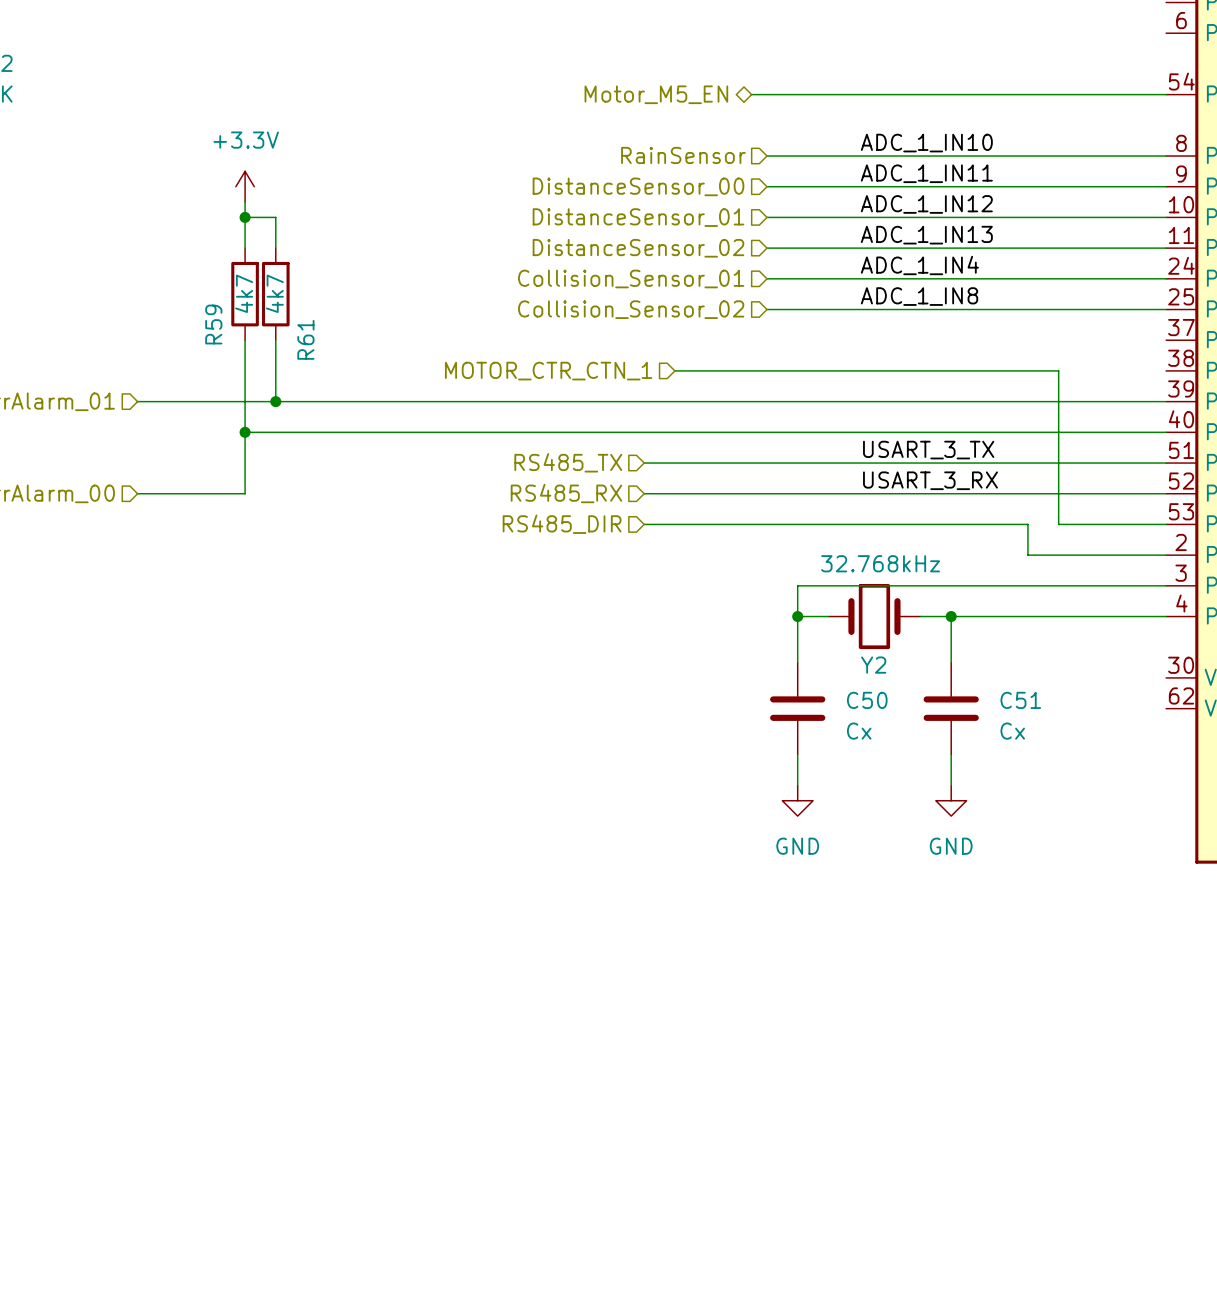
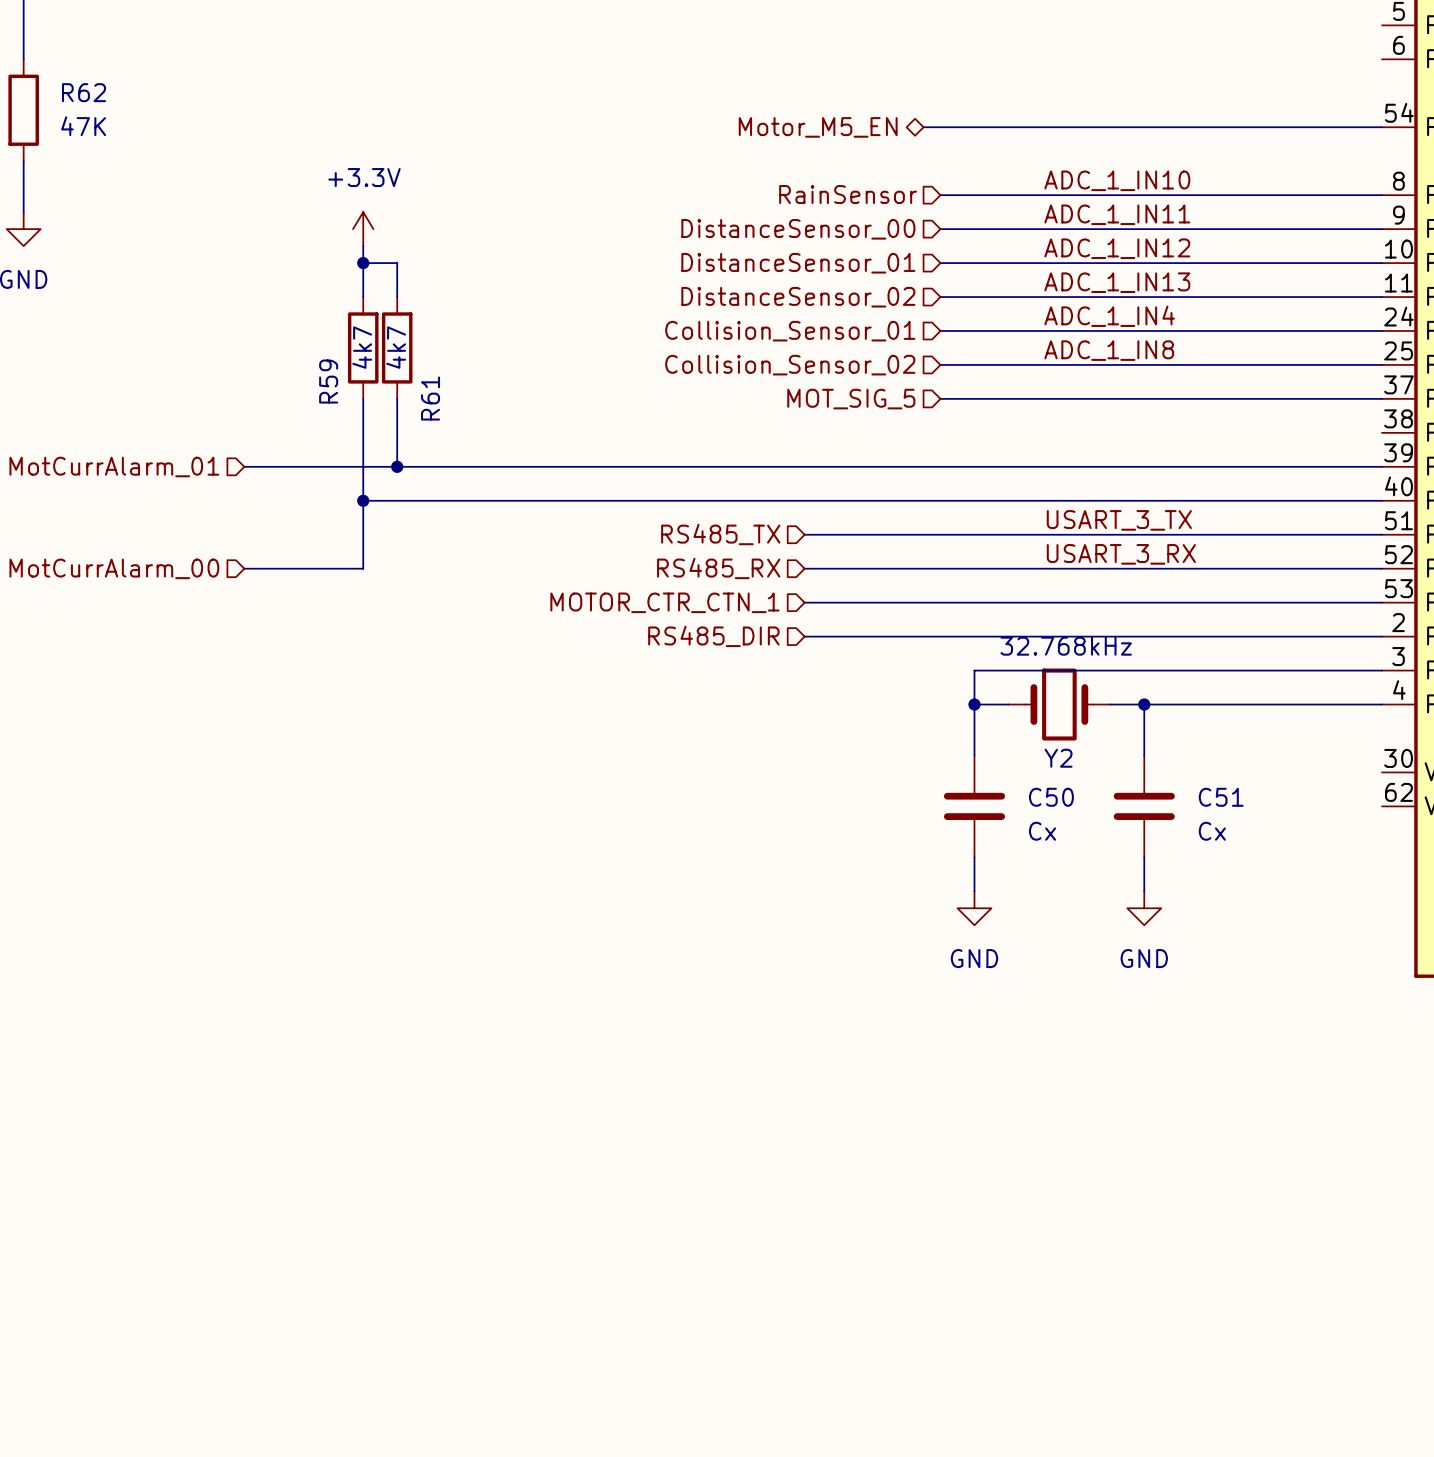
hierarchical label: none -> MOT_SIG_5 (851, 399)
wire: none -> (940, 398) (1381, 398)
wire: (674, 370) (1058, 370) (1058, 524) -> none
hierarchical label: MOTOR_CTR_CTN_1 (548, 371) -> none
hierarchical label: RS485_DIR (562, 524) -> MOTOR_CTR_CTN_1 (664, 602)
wire: (1027, 524) (1027, 555) -> (1229, 602) (1263, 602)
hierarchical label: none -> RS485_DIR (713, 636)
wire: none -> (804, 636) (1229, 636)

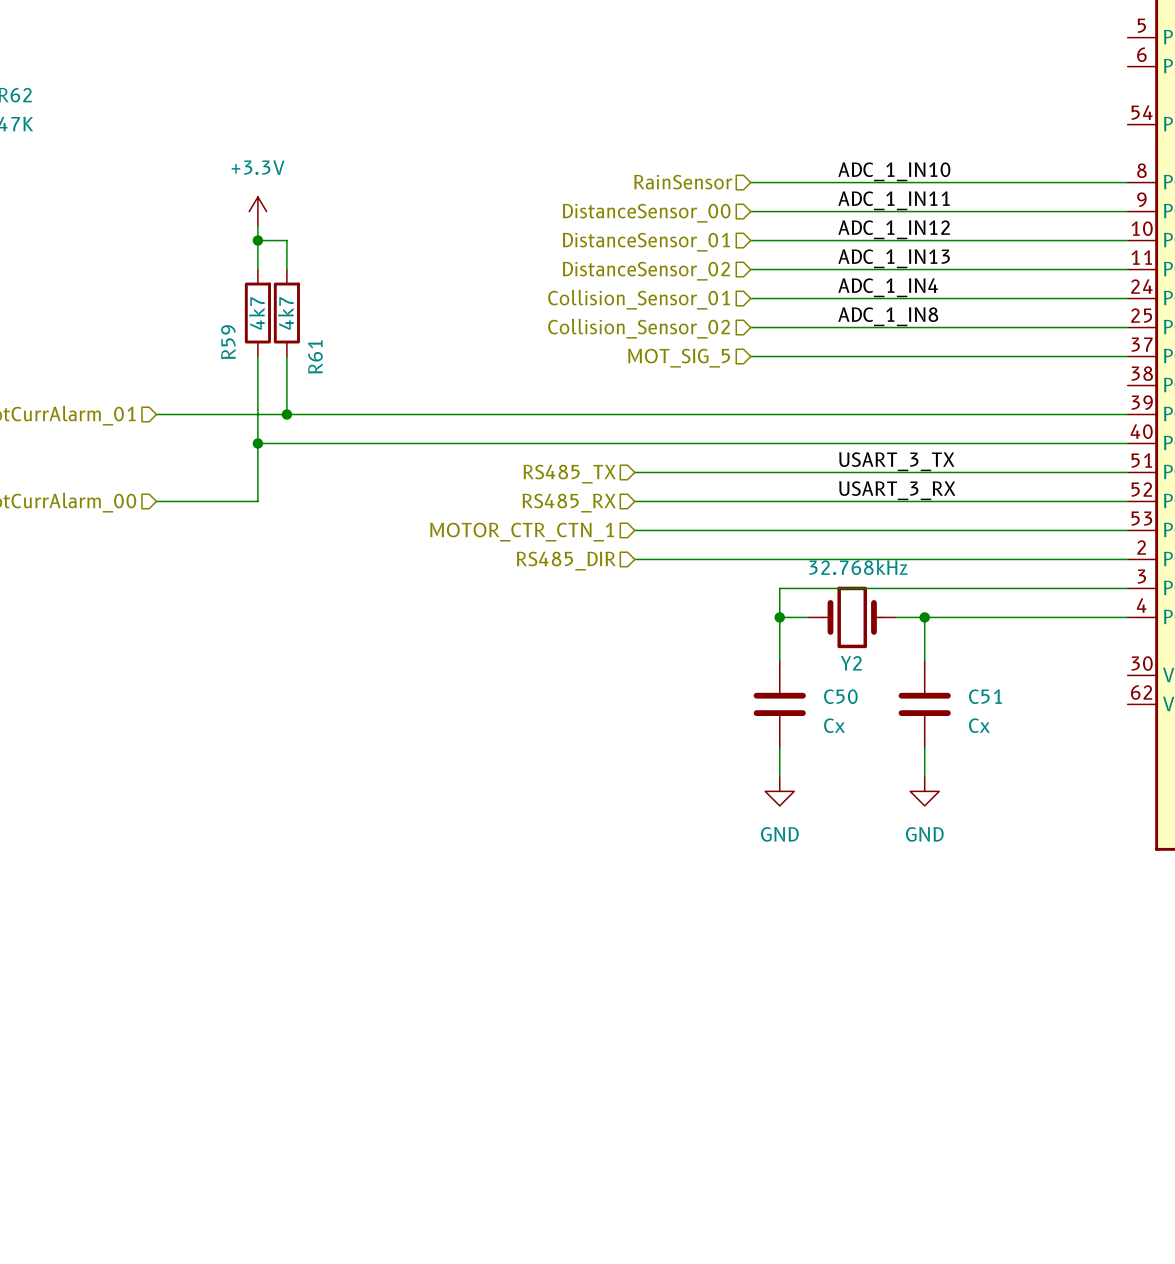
hierarchical label: Motor_M5_EN (818, 127) -> none
wire: (923, 127) (1381, 127) -> none

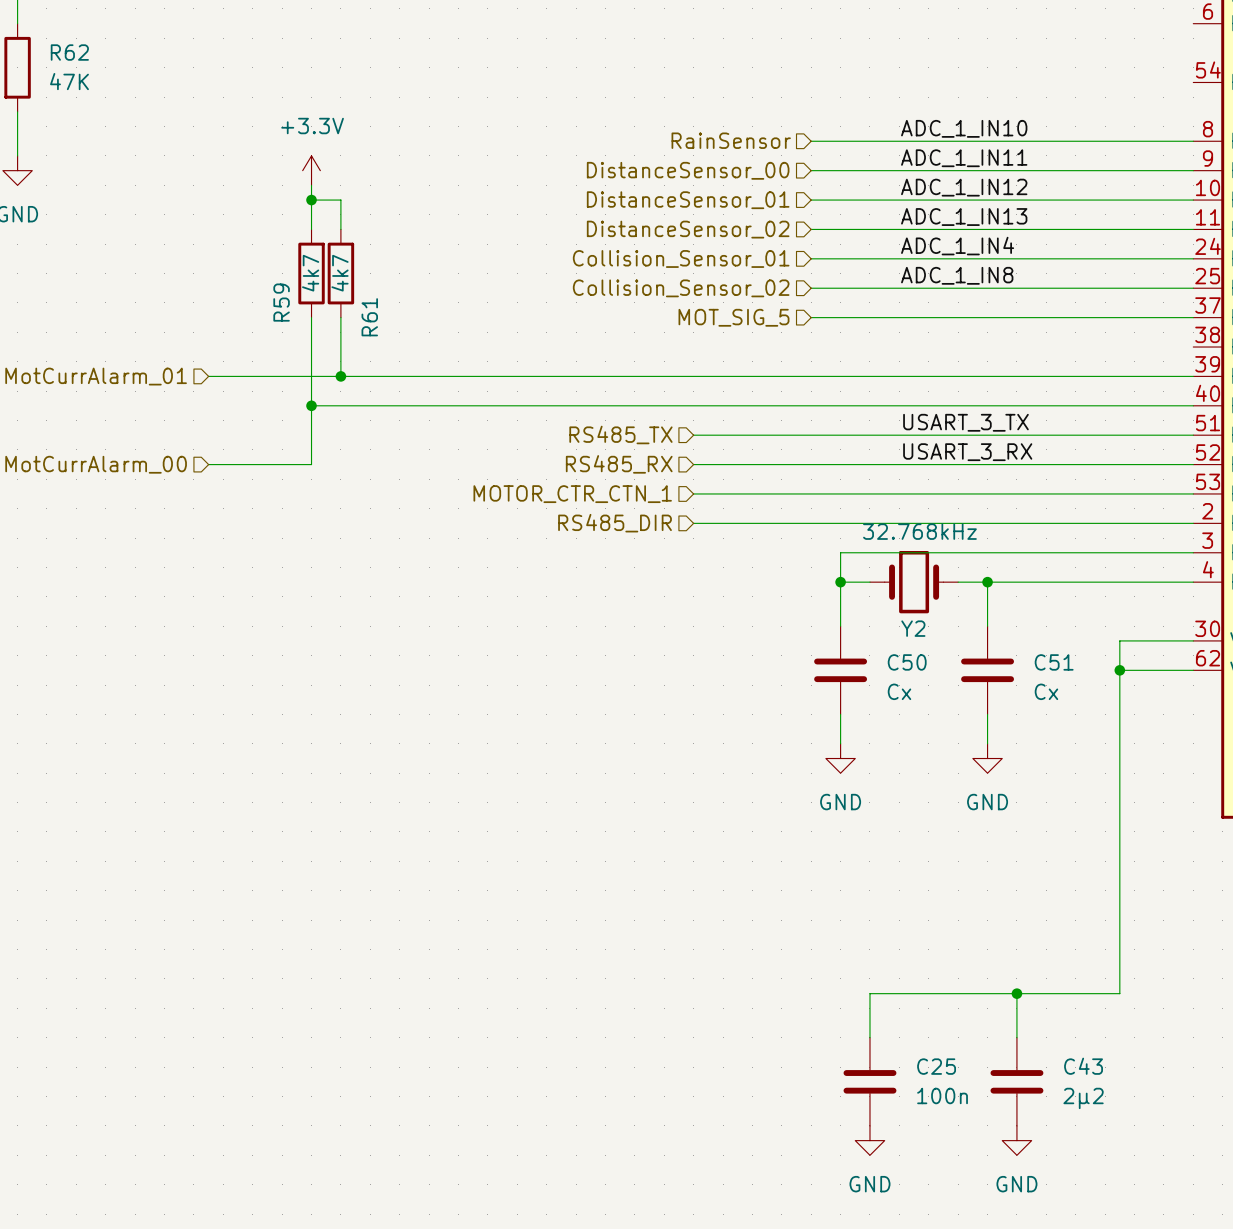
wire: none -> (1193, 640) (1119, 640) (1119, 993) (869, 993) (869, 1037)
wire: none -> (1119, 670) (1193, 670)
junction: none -> (1119, 670)
wire: none -> (1016, 993) (1016, 1037)
junction: none -> (1016, 993)
C25: none -> 100n (869, 1081)
C43: none -> 2µ2 (1016, 1081)
power symbol: none -> GND (869, 1140)
power symbol: none -> GND (1016, 1140)

